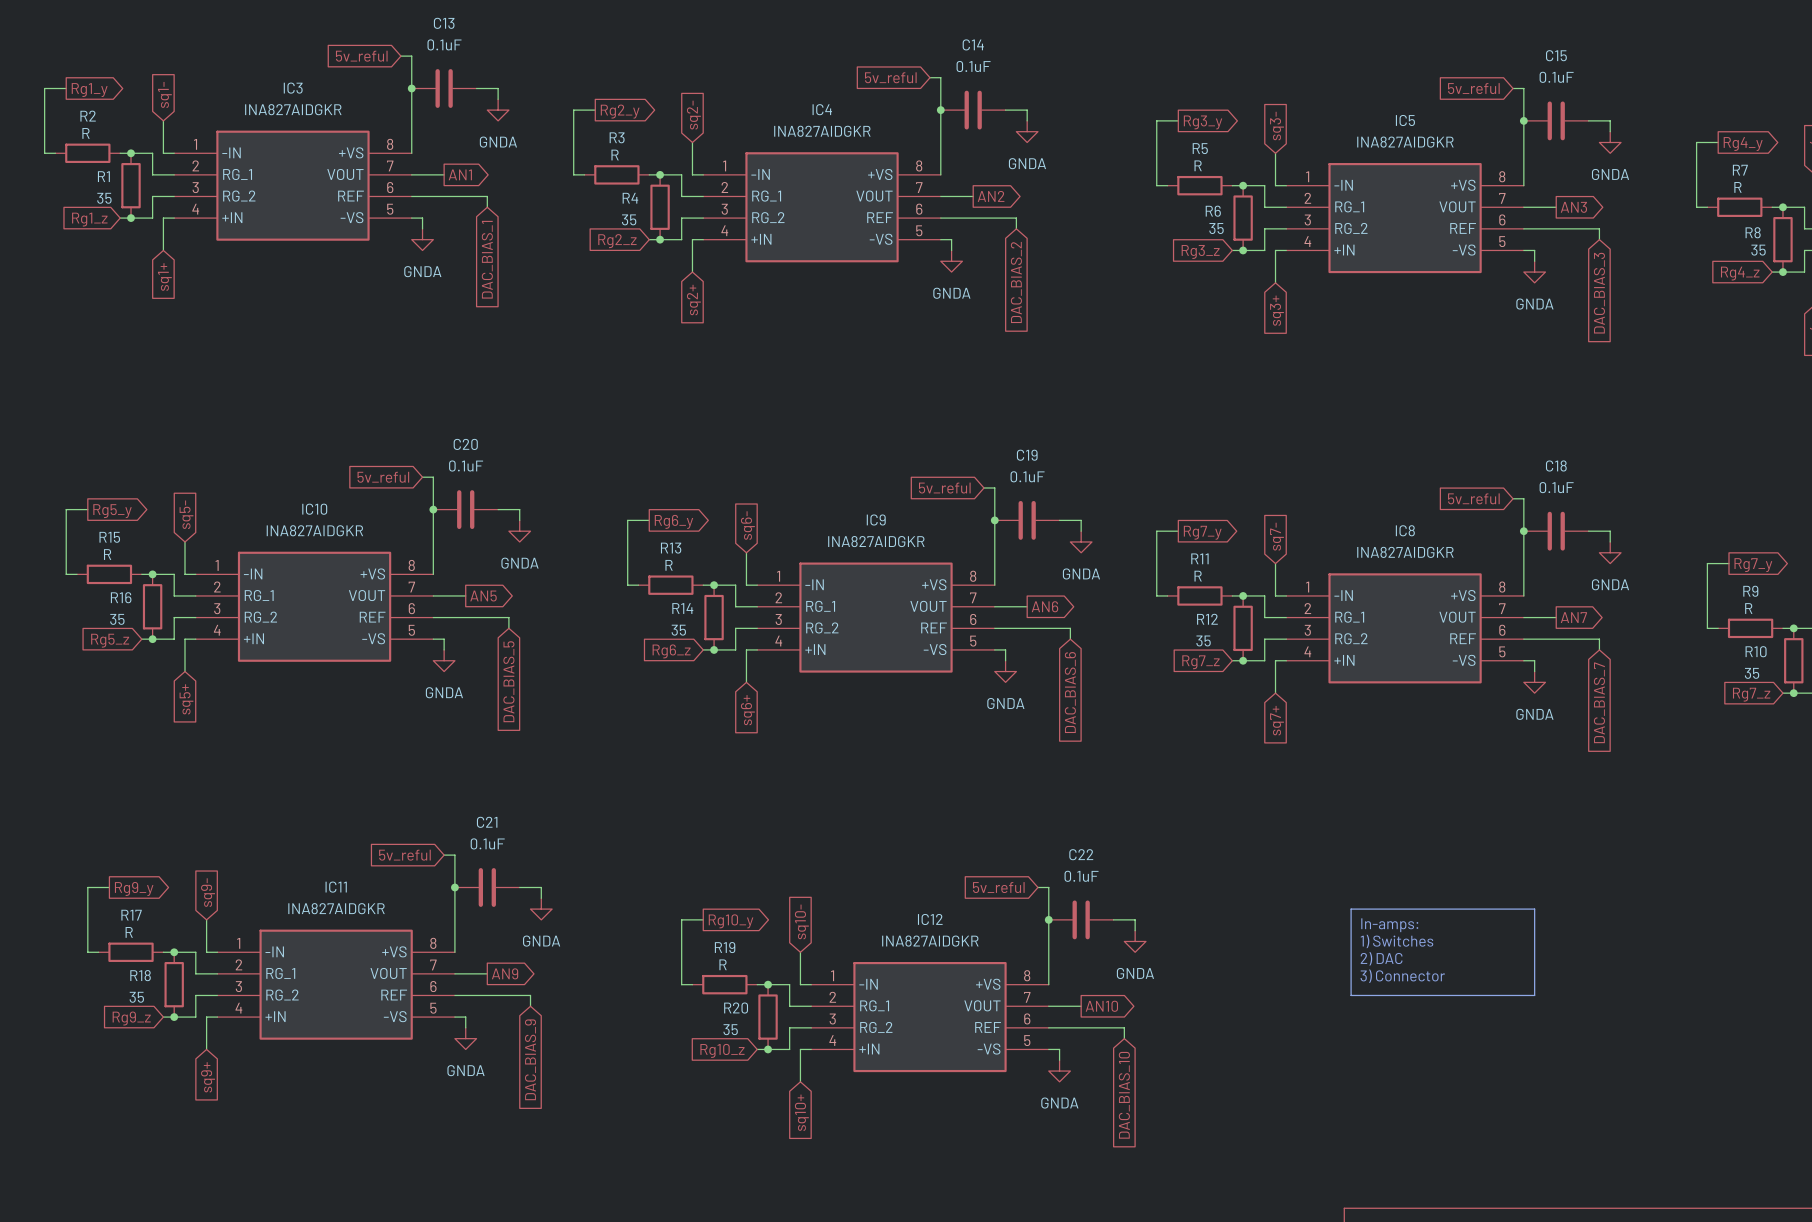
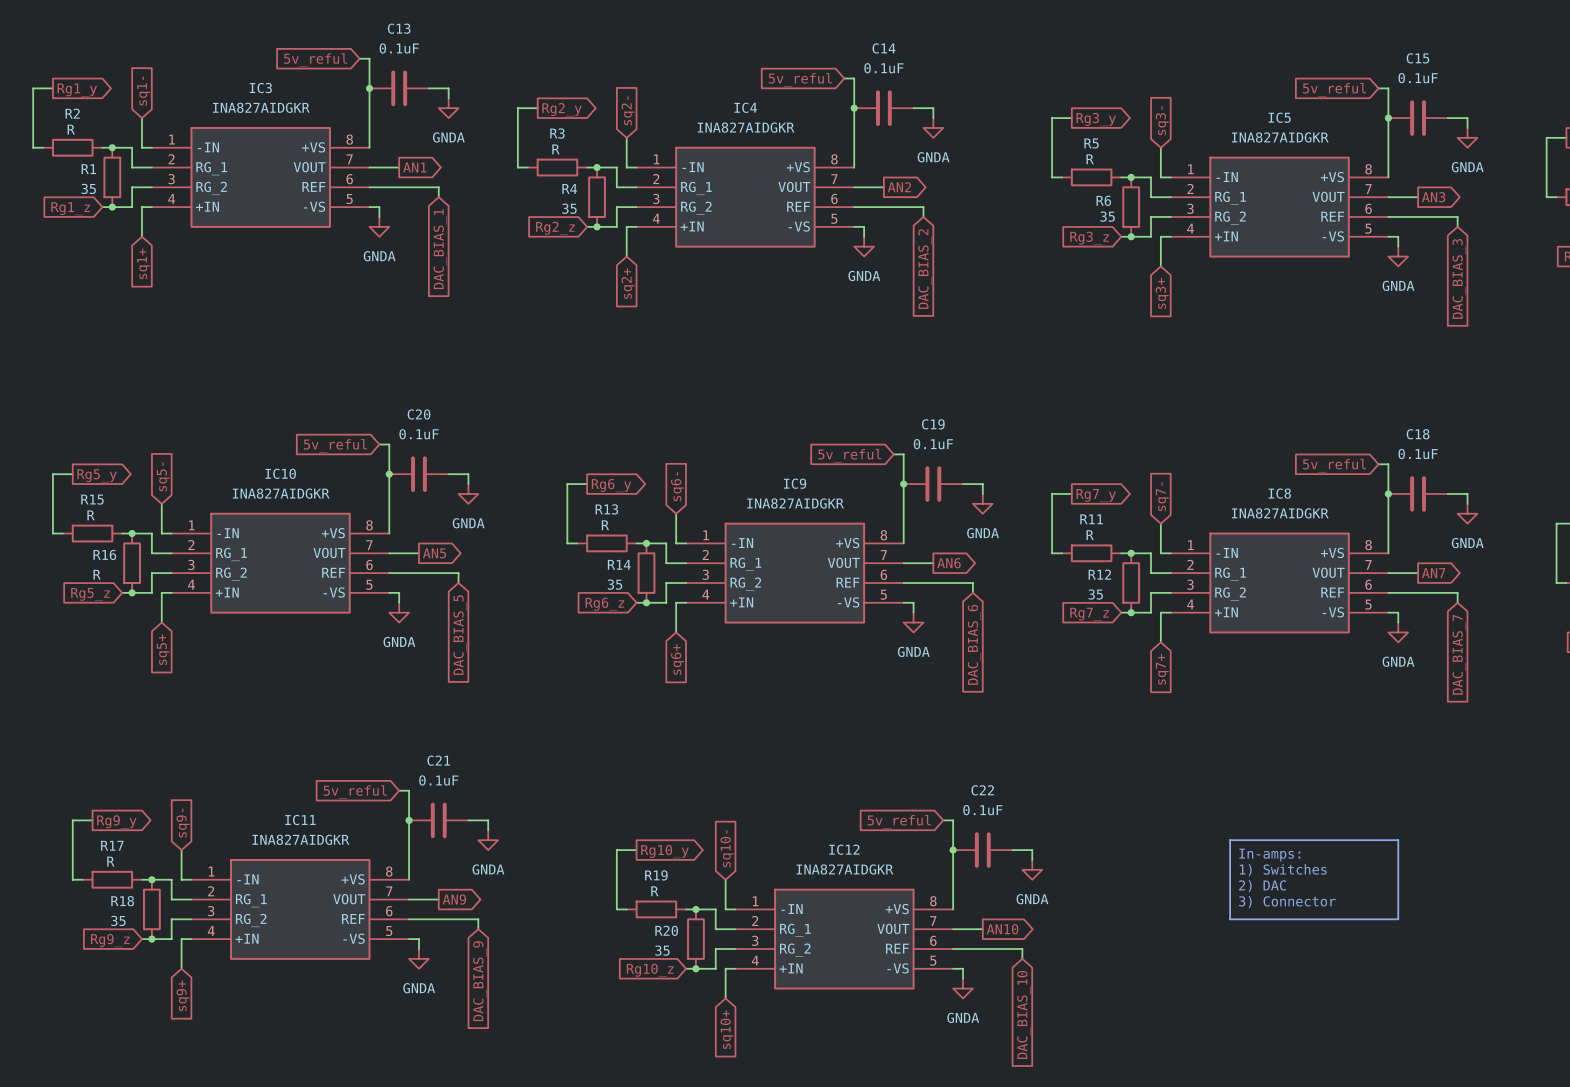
R16 value: 35 (117, 619) -> R (97, 574)

